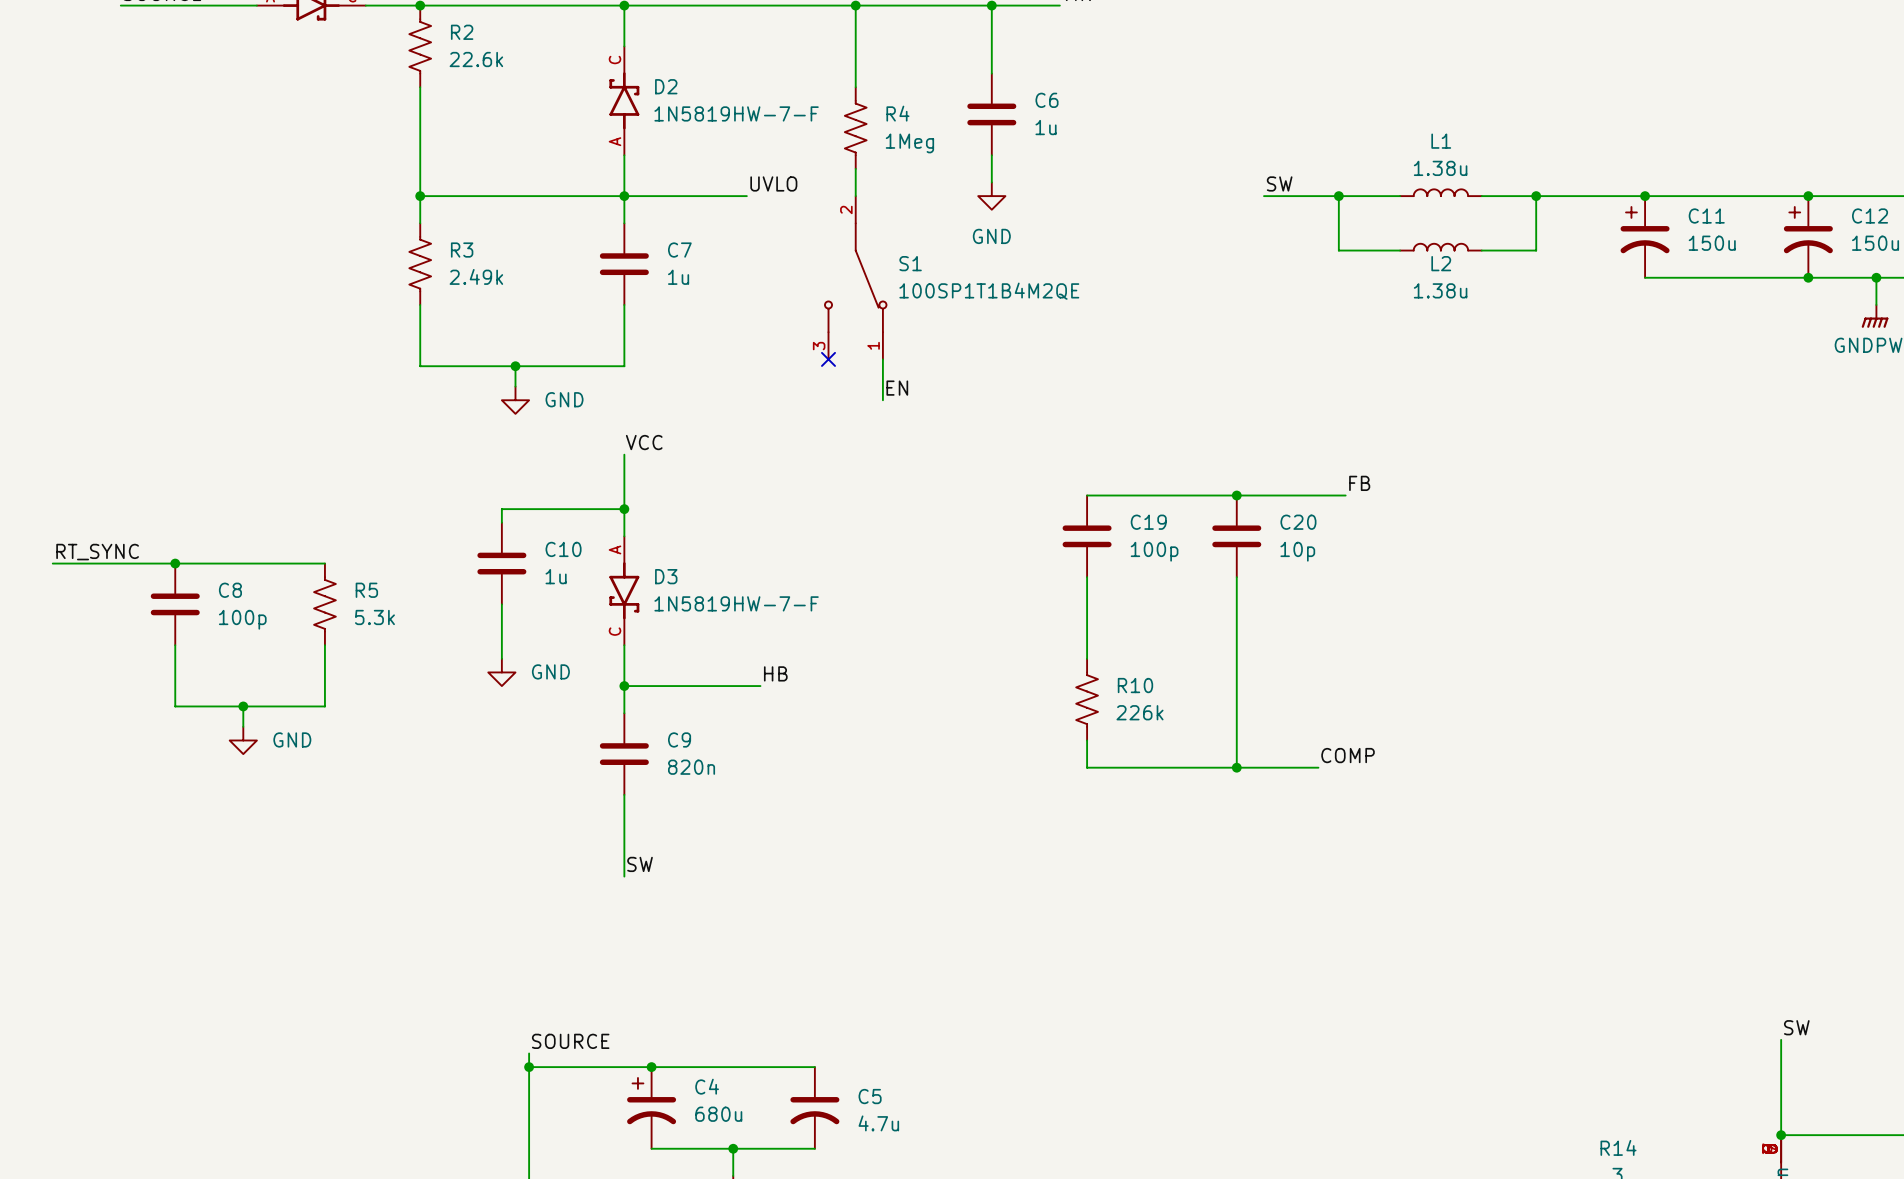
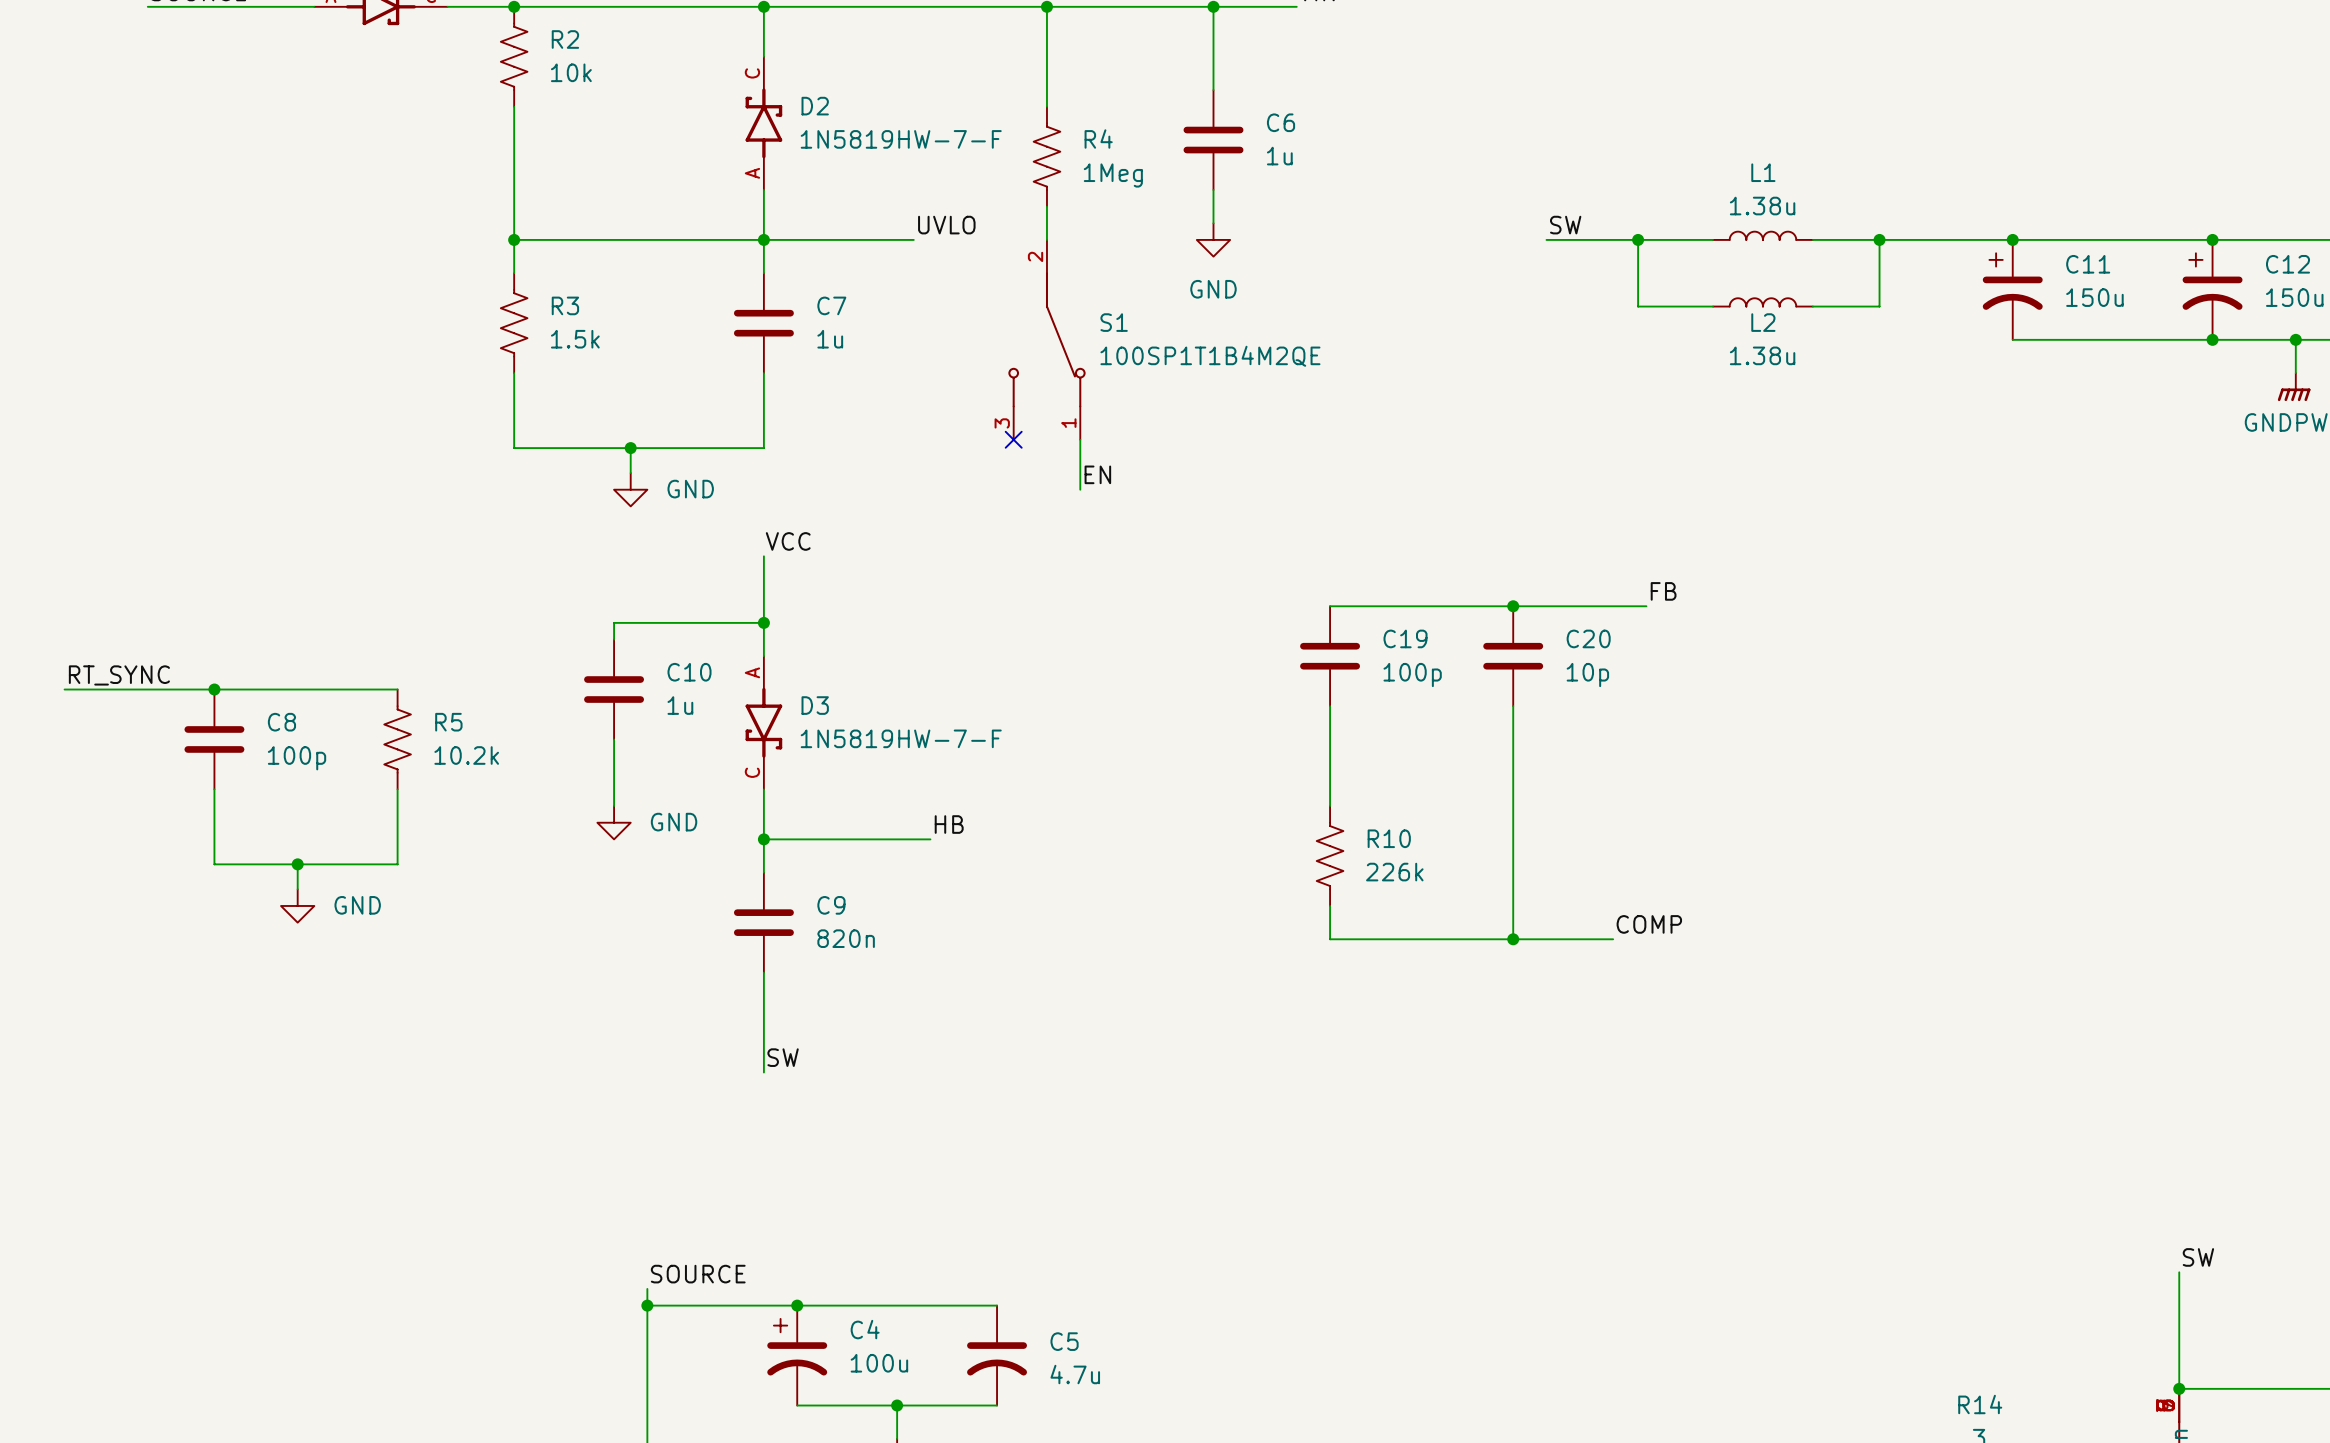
R2 value: 22.6k (476, 59) -> 10k (571, 72)
R3 value: 2.49k (476, 276) -> 1.5k (575, 339)
R5 value: 5.3k (374, 617) -> 10.2k (466, 755)
C4 value: 680u (718, 1114) -> 100u (879, 1363)

